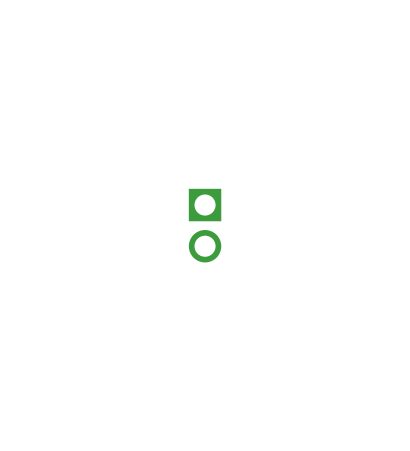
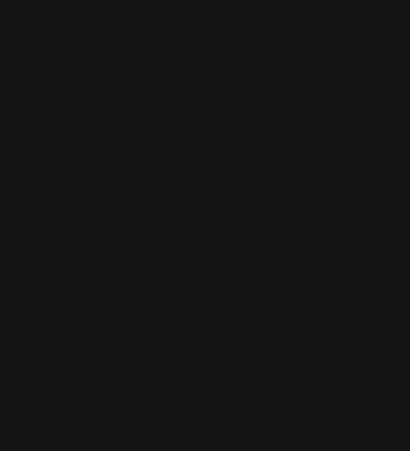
part: (205, 225) -> none

